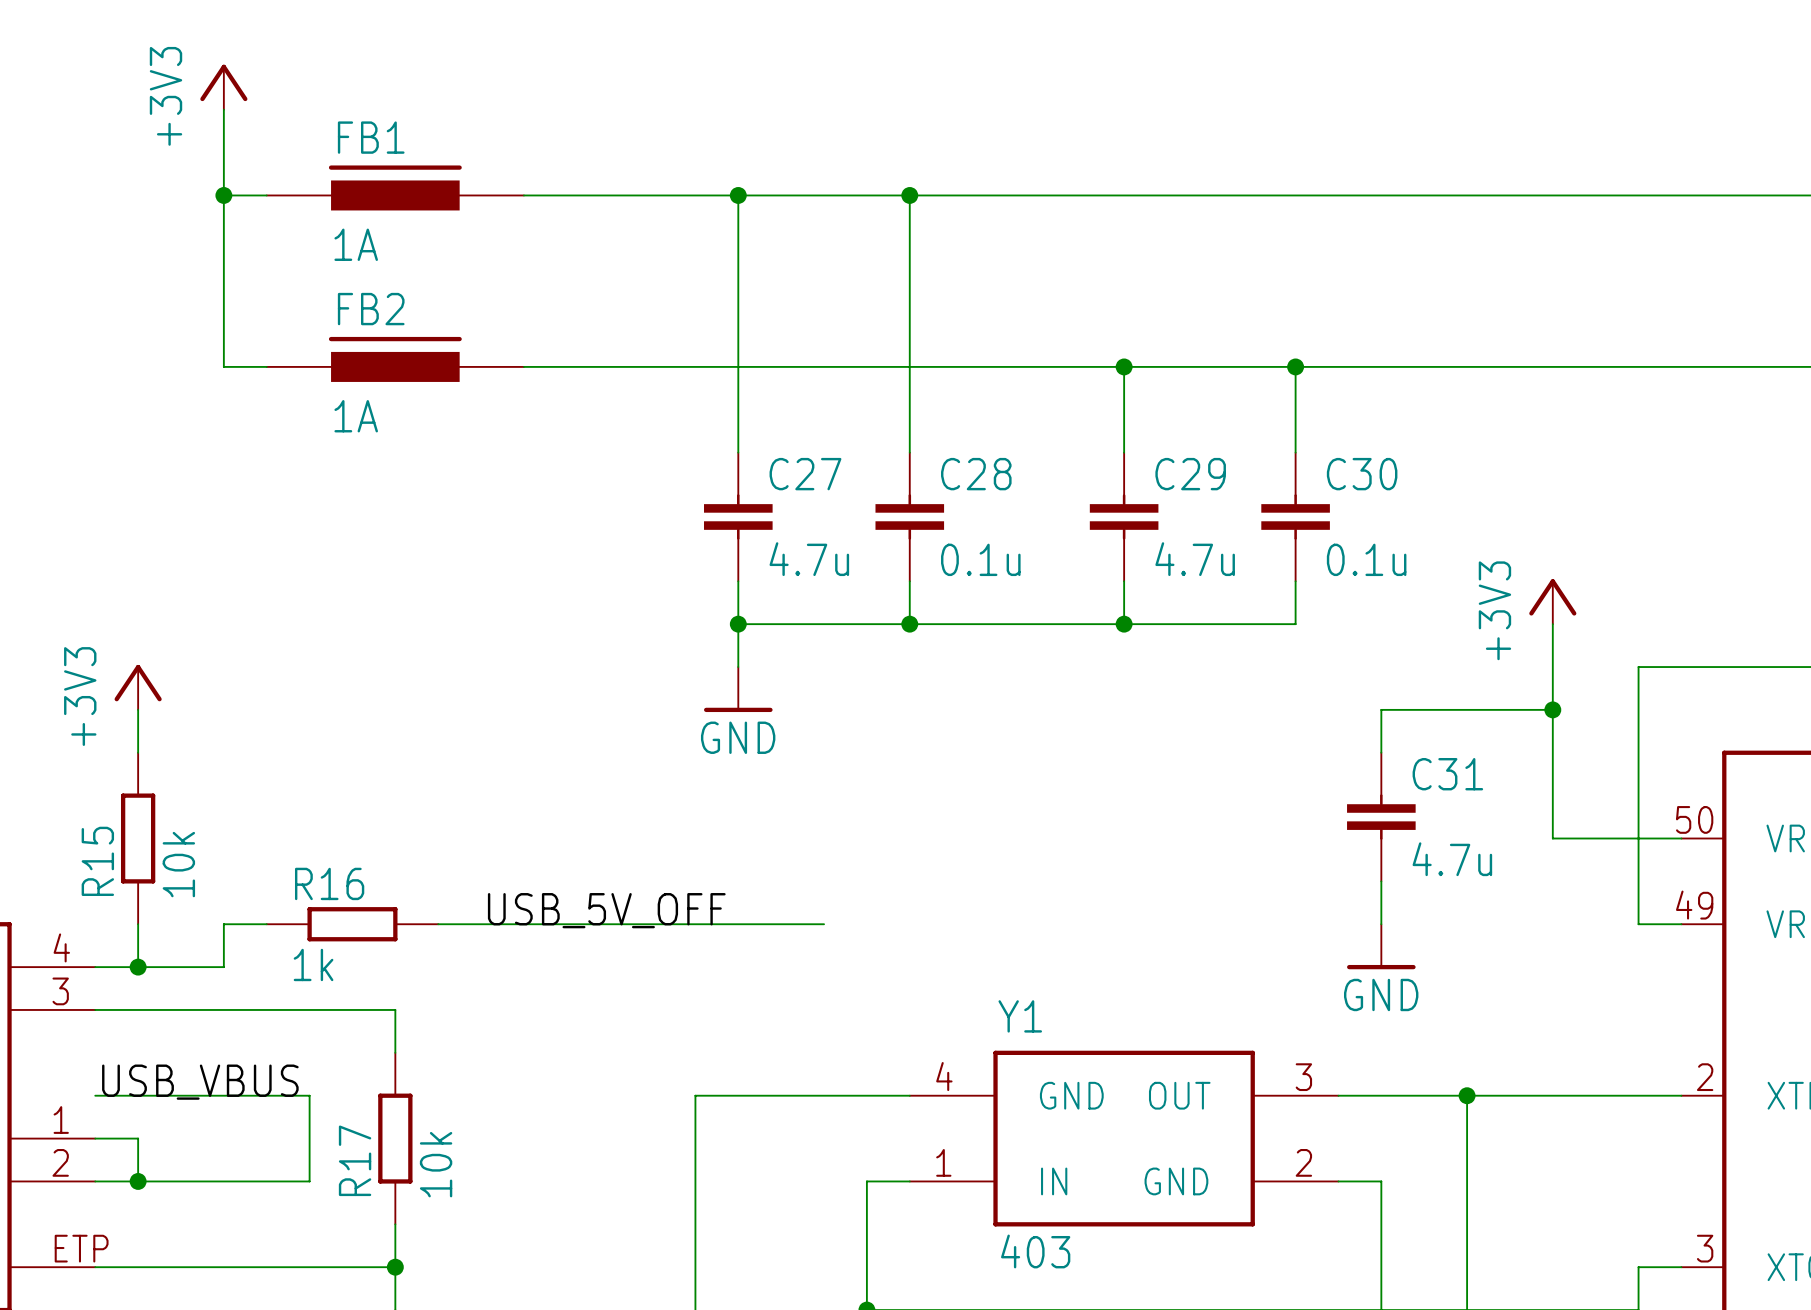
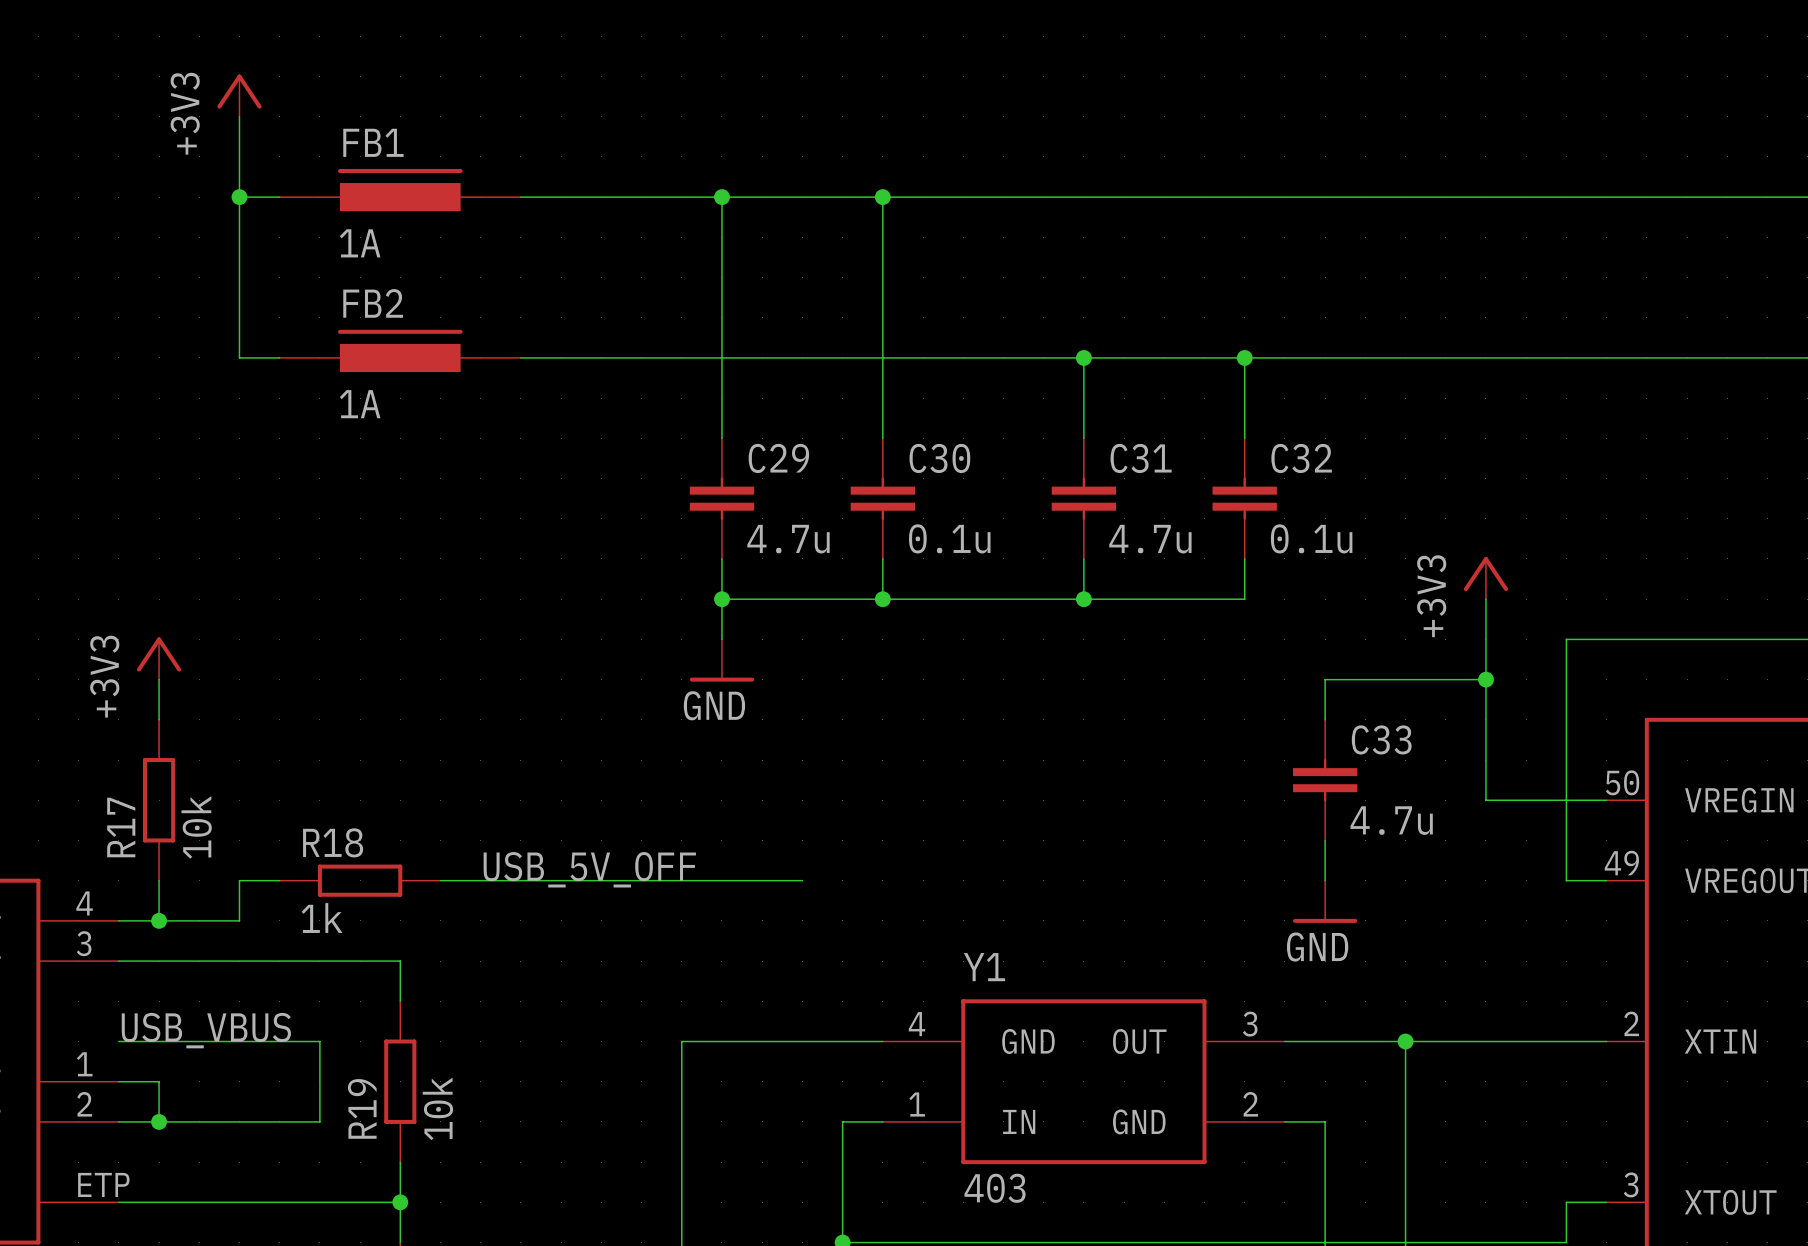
C27 name: C27 (805, 474) -> C29 (778, 458)
C28 name: C28 (976, 474) -> C30 (939, 458)
C29 name: C29 (1190, 474) -> C31 (1141, 458)
C30 name: C30 (1362, 474) -> C32 (1301, 458)
C31 name: C31 (1447, 774) -> C33 (1381, 739)
R15 name: R15 (97, 861) -> R17 (121, 827)
R16 name: R16 (329, 883) -> R18 (333, 842)
R17 name: R17 (355, 1160) -> R19 (362, 1108)

